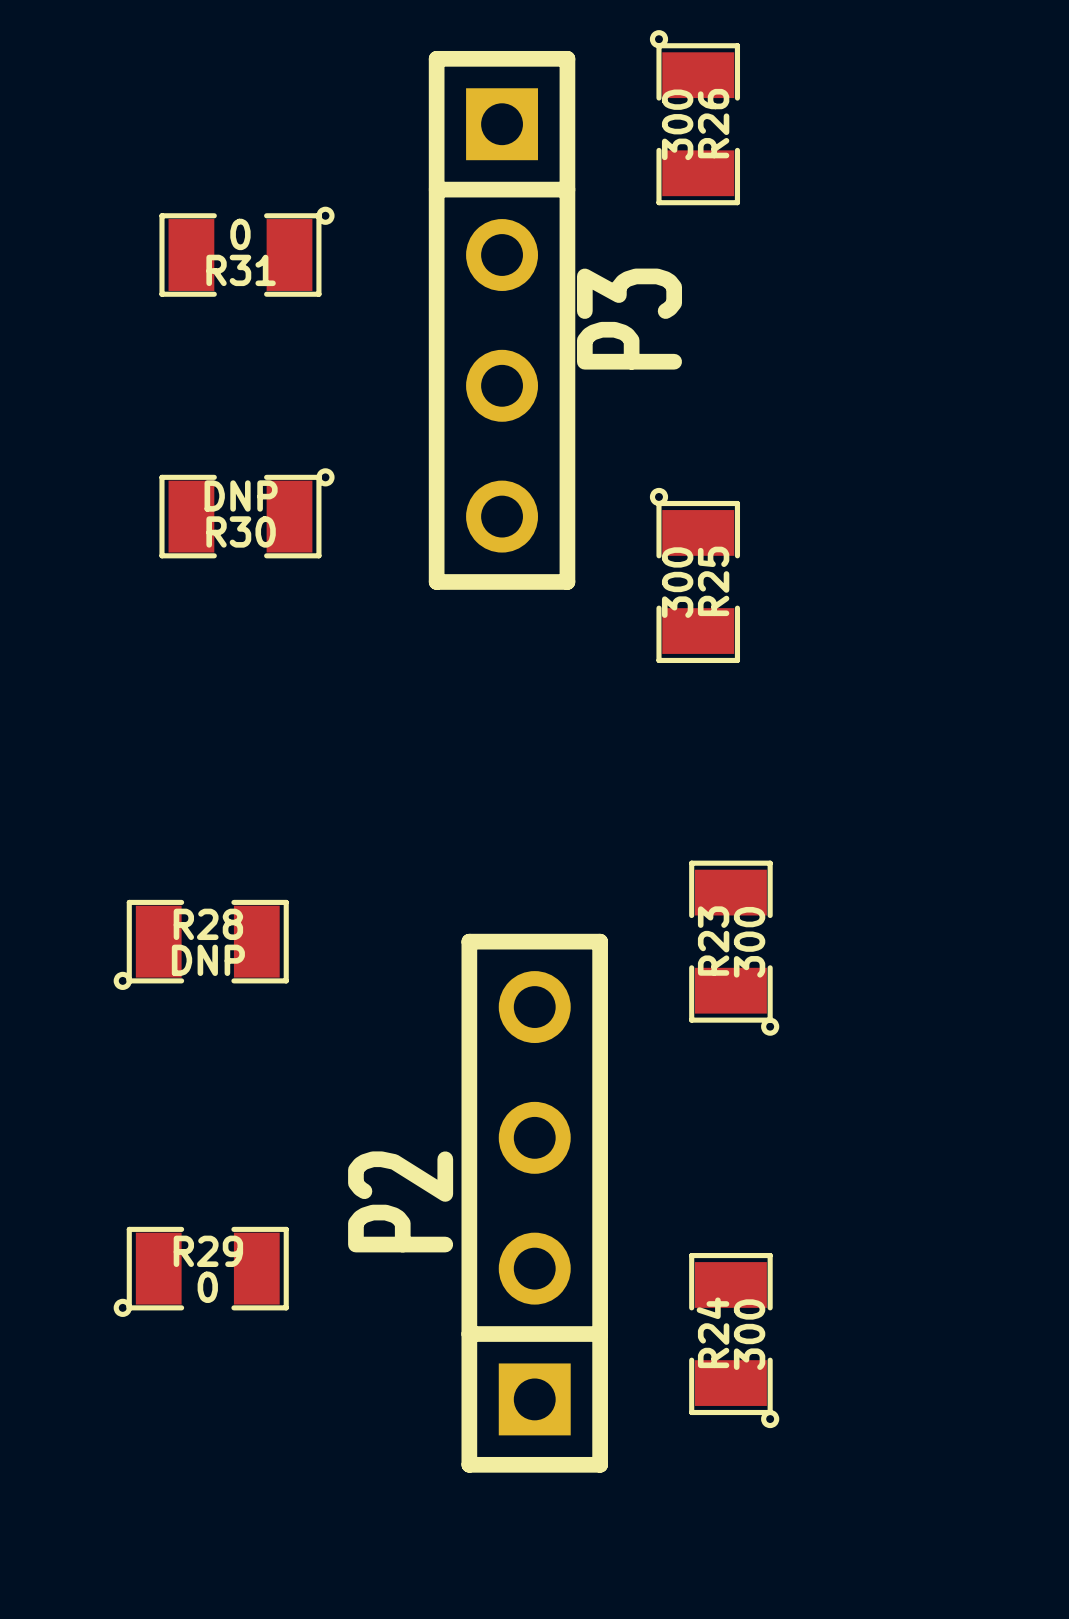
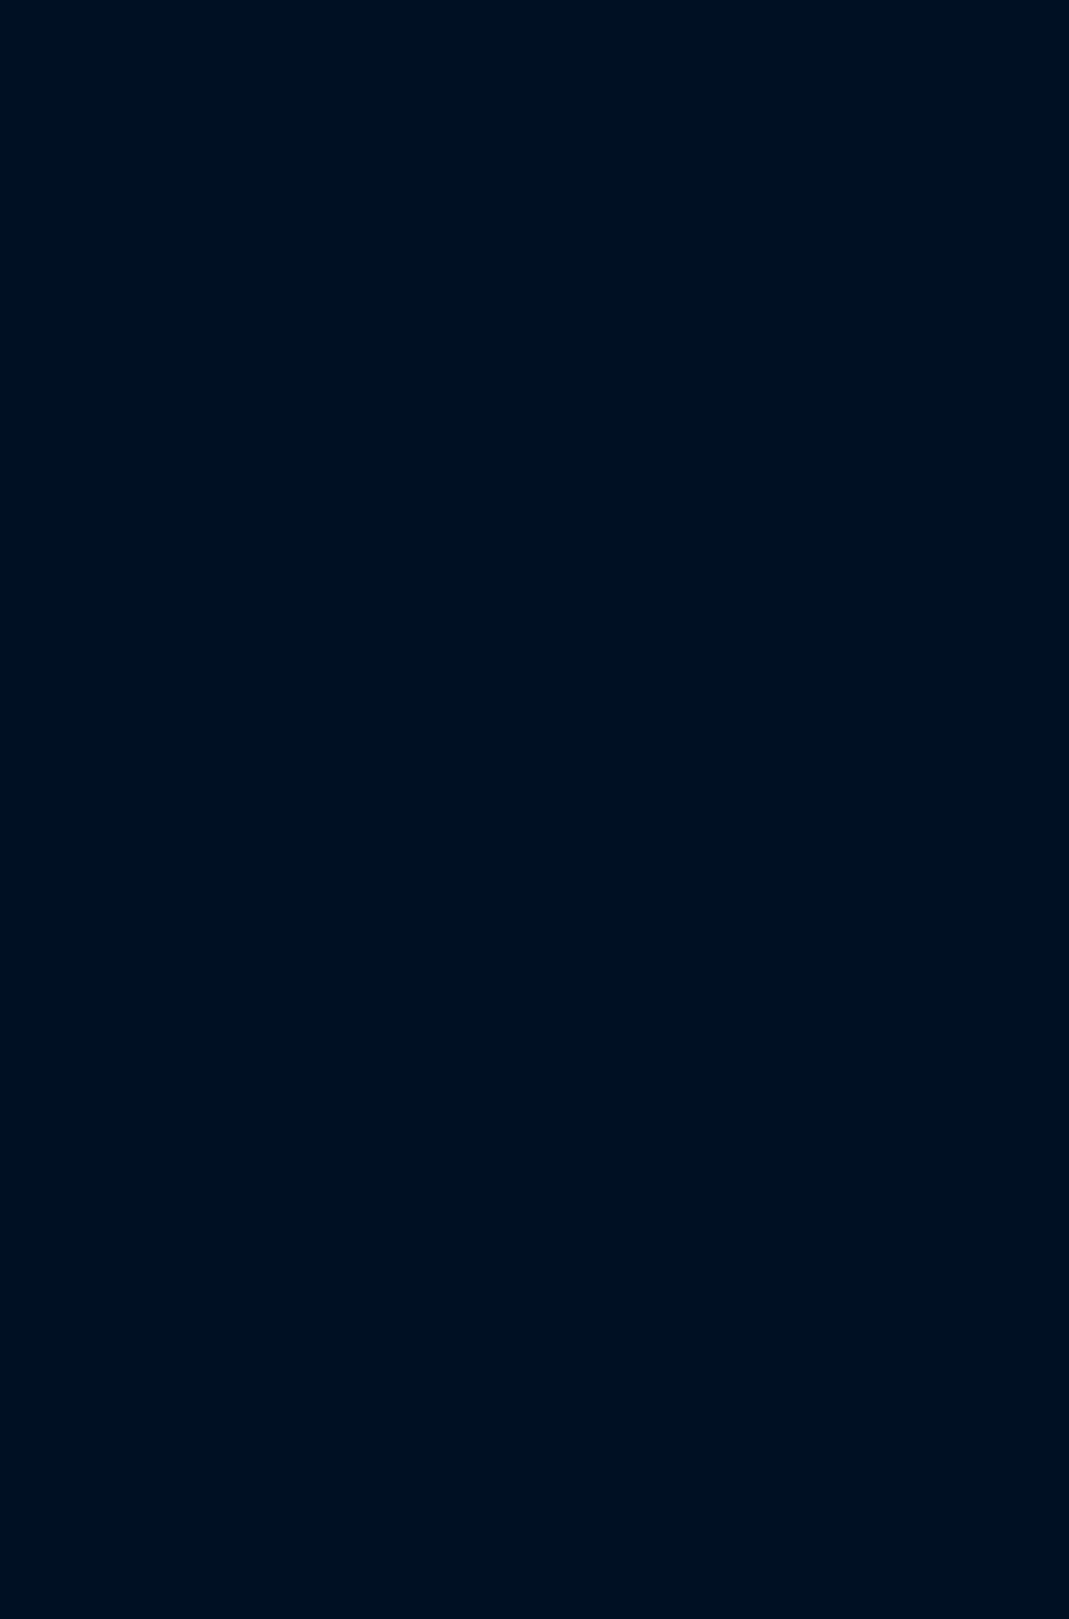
R26: 300 (694, 117) -> none
R31: 0 (247, 251) -> none
P3: (502, 320) -> none
R30: DNP (247, 513) -> none
R25: 300 (694, 575) -> none
R28: DNP (201, 944) -> none
R23: 300 (734, 948) -> none
P2: (534, 1203) -> none
R29: 0 (201, 1271) -> none
R24: 300 (734, 1340) -> none

